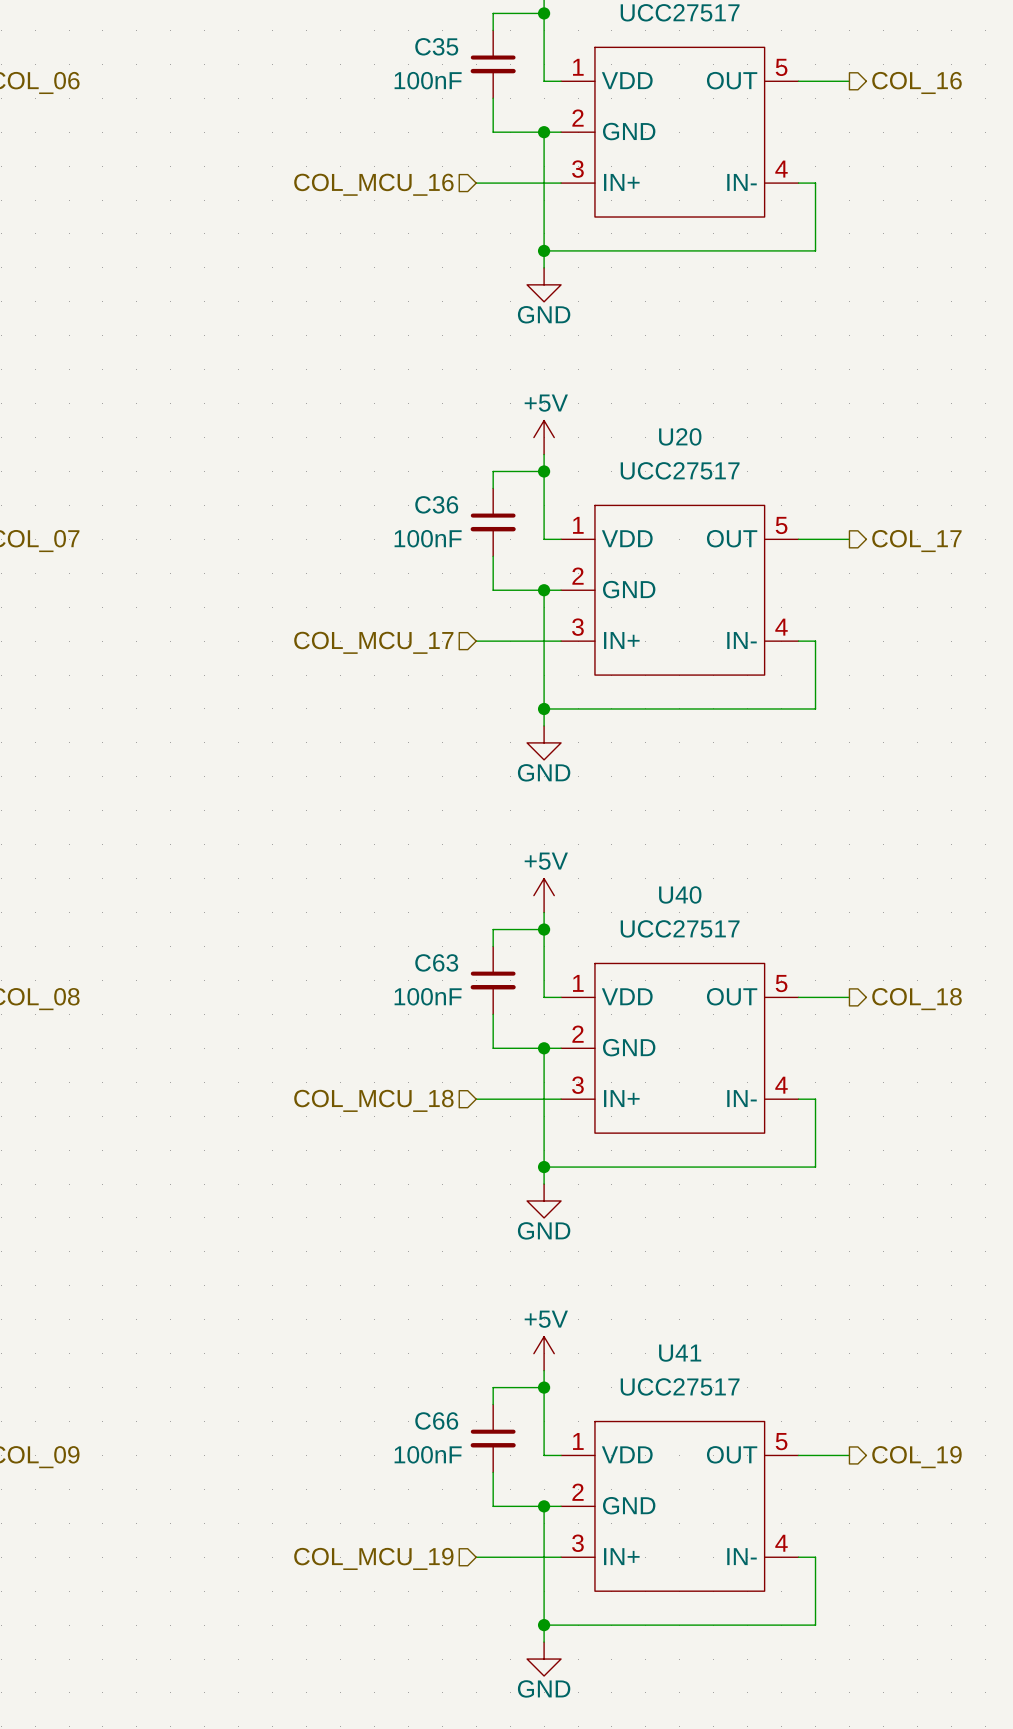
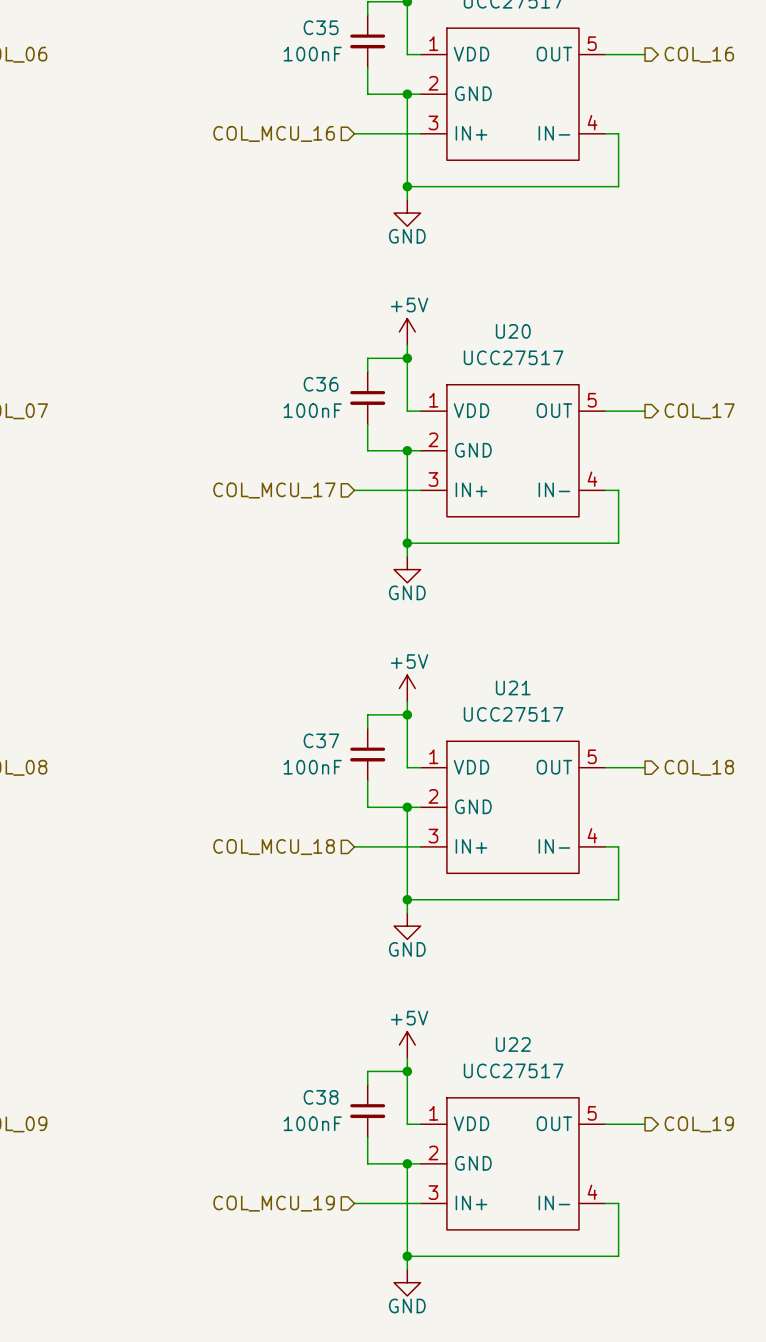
U40 name: U40 (680, 894) -> U21 (513, 687)
C63 name: C63 (436, 962) -> C37 (321, 740)
U41 name: U41 (680, 1353) -> U22 (513, 1044)
C66 name: C66 (436, 1420) -> C38 (321, 1097)

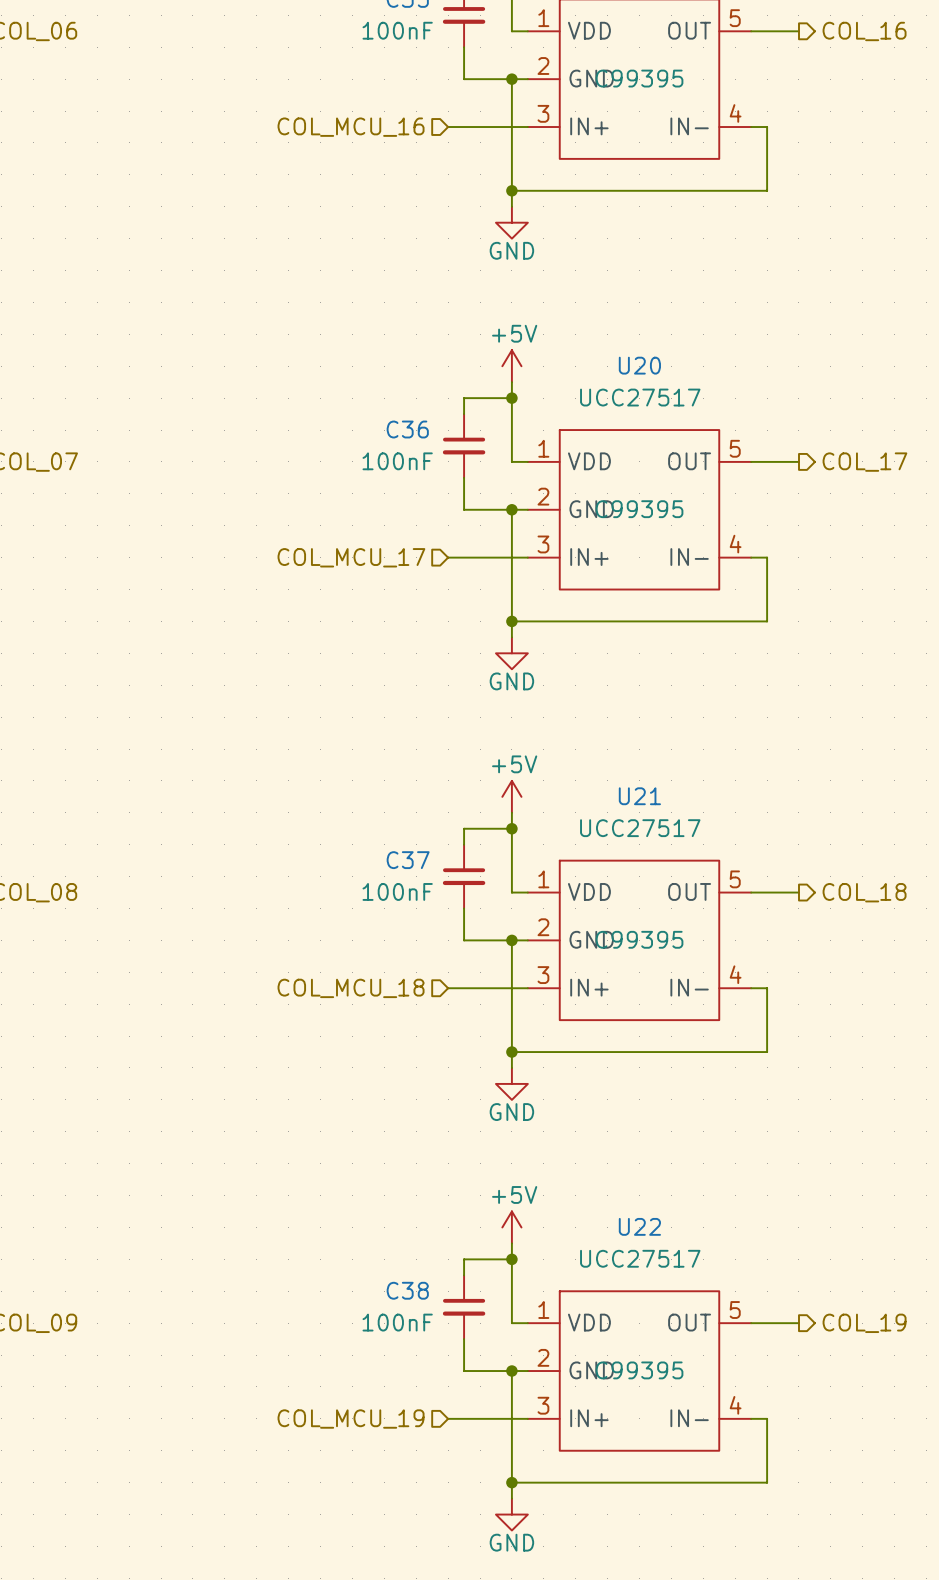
part text: none -> C99395 (639, 78)
U20 text: none -> C99395 (639, 509)
U21 text: none -> C99395 (639, 939)
U22 text: none -> C99395 (639, 1370)

